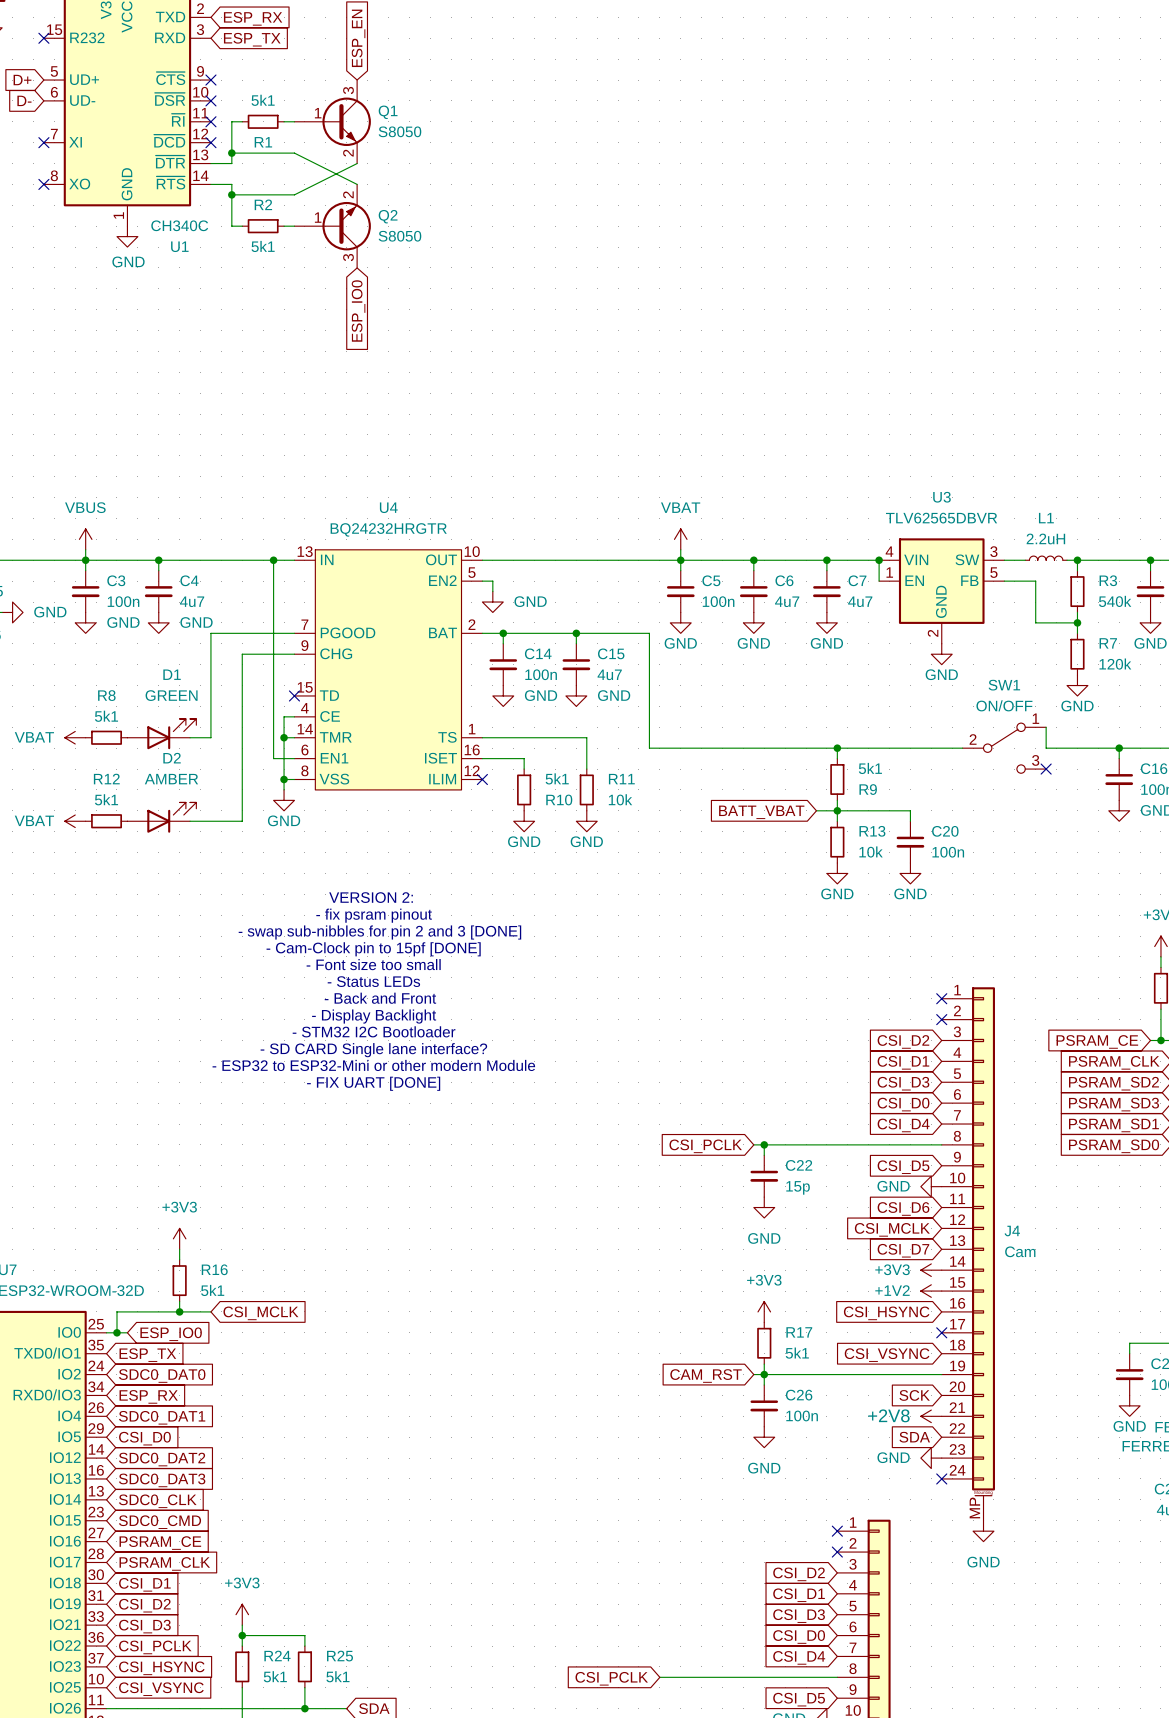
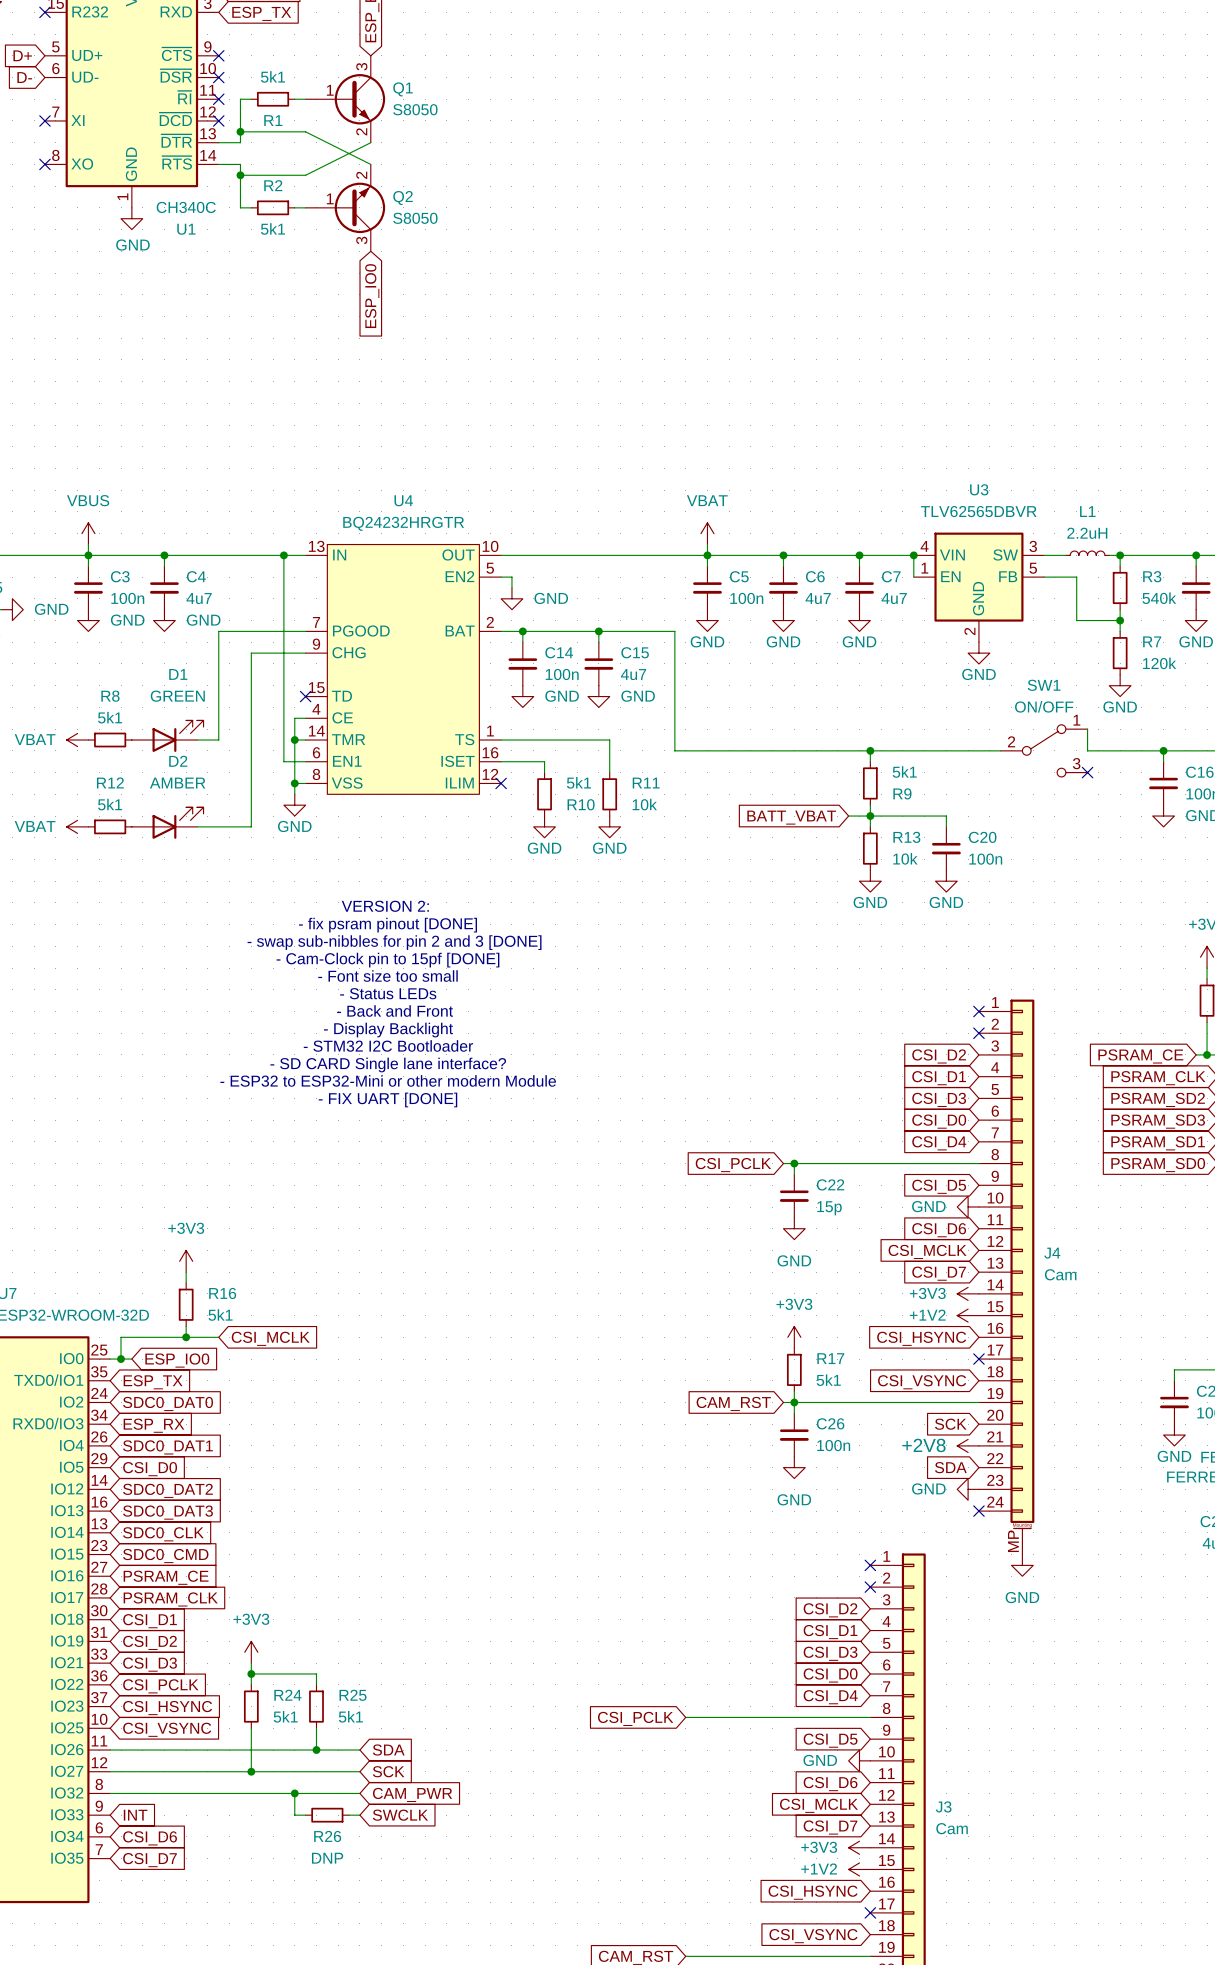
text: - fix psram pinout (374, 915) -> - fix psram pinout [DONE] (387, 925)

